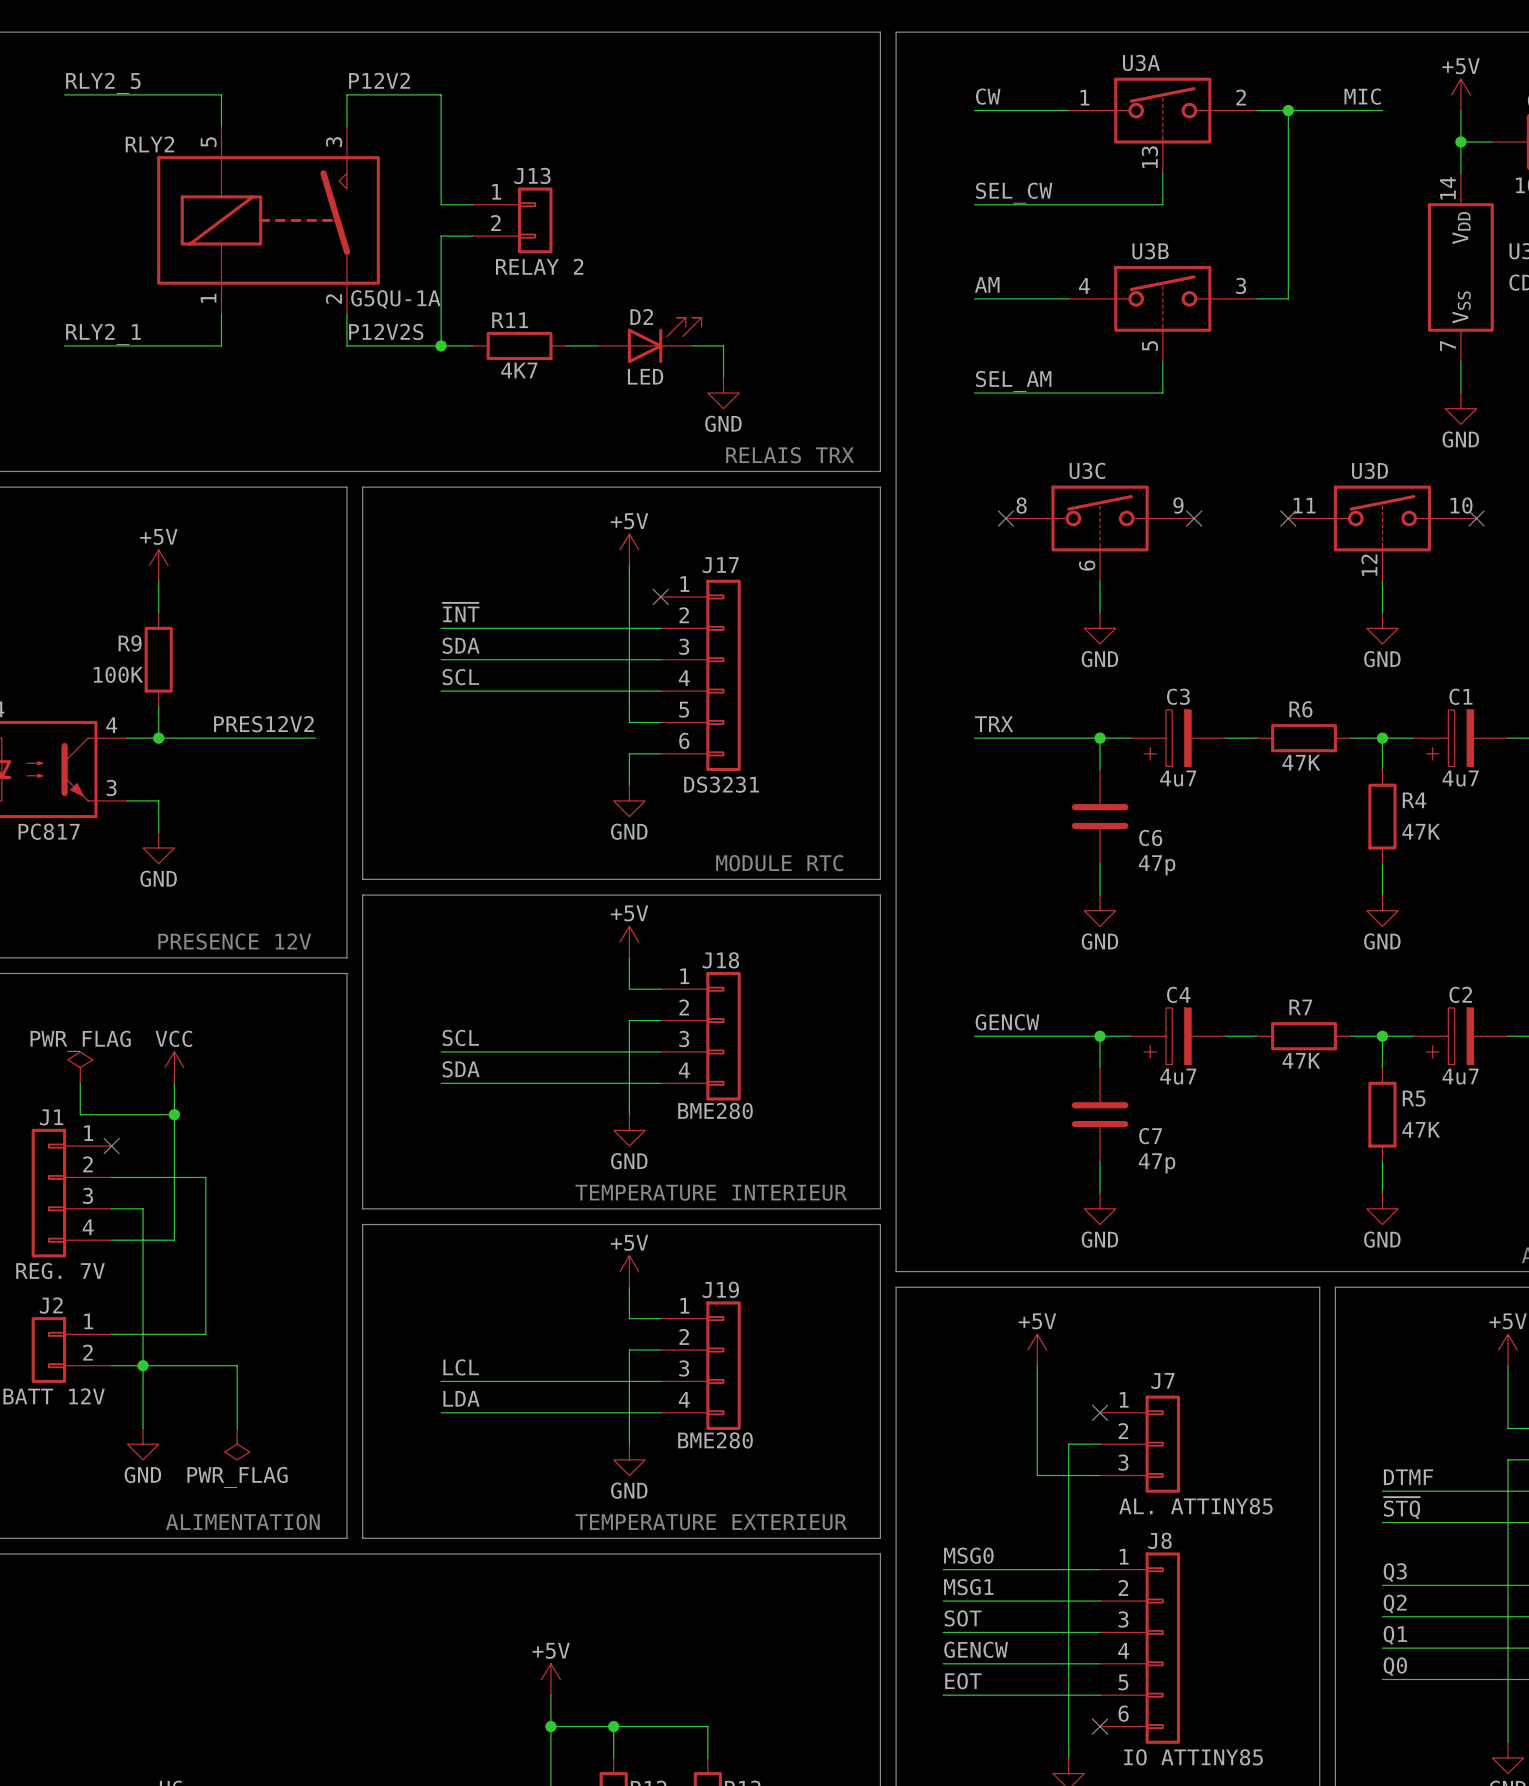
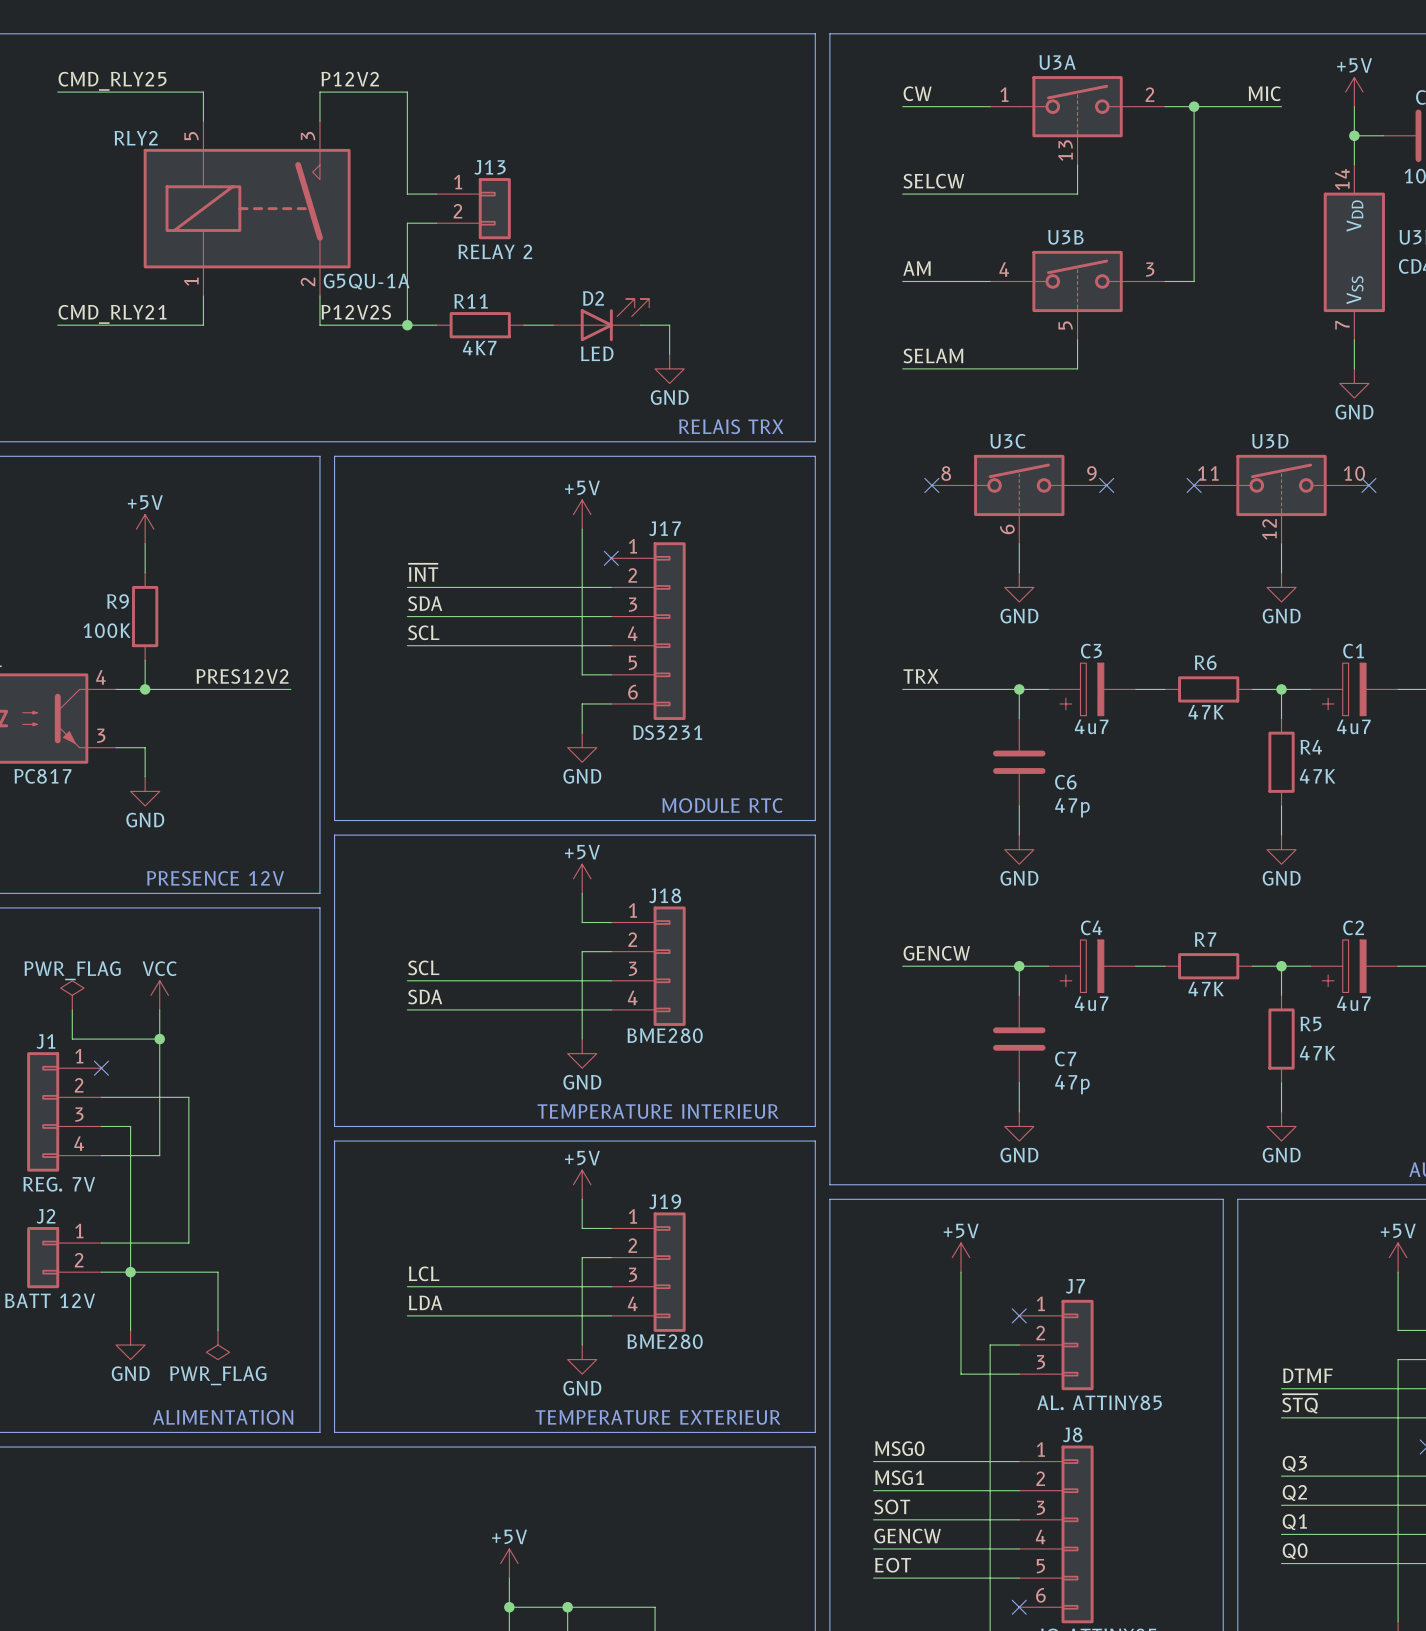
label: RLY2_5 (103, 83) -> CMD_RLY25 (112, 81)
label: SEL_CW (1014, 193) -> SELCW (933, 181)
label: RLY2_1 (103, 334) -> CMD_RLY21 (112, 314)
label: SEL_AM (1013, 381) -> SELAM (933, 355)

